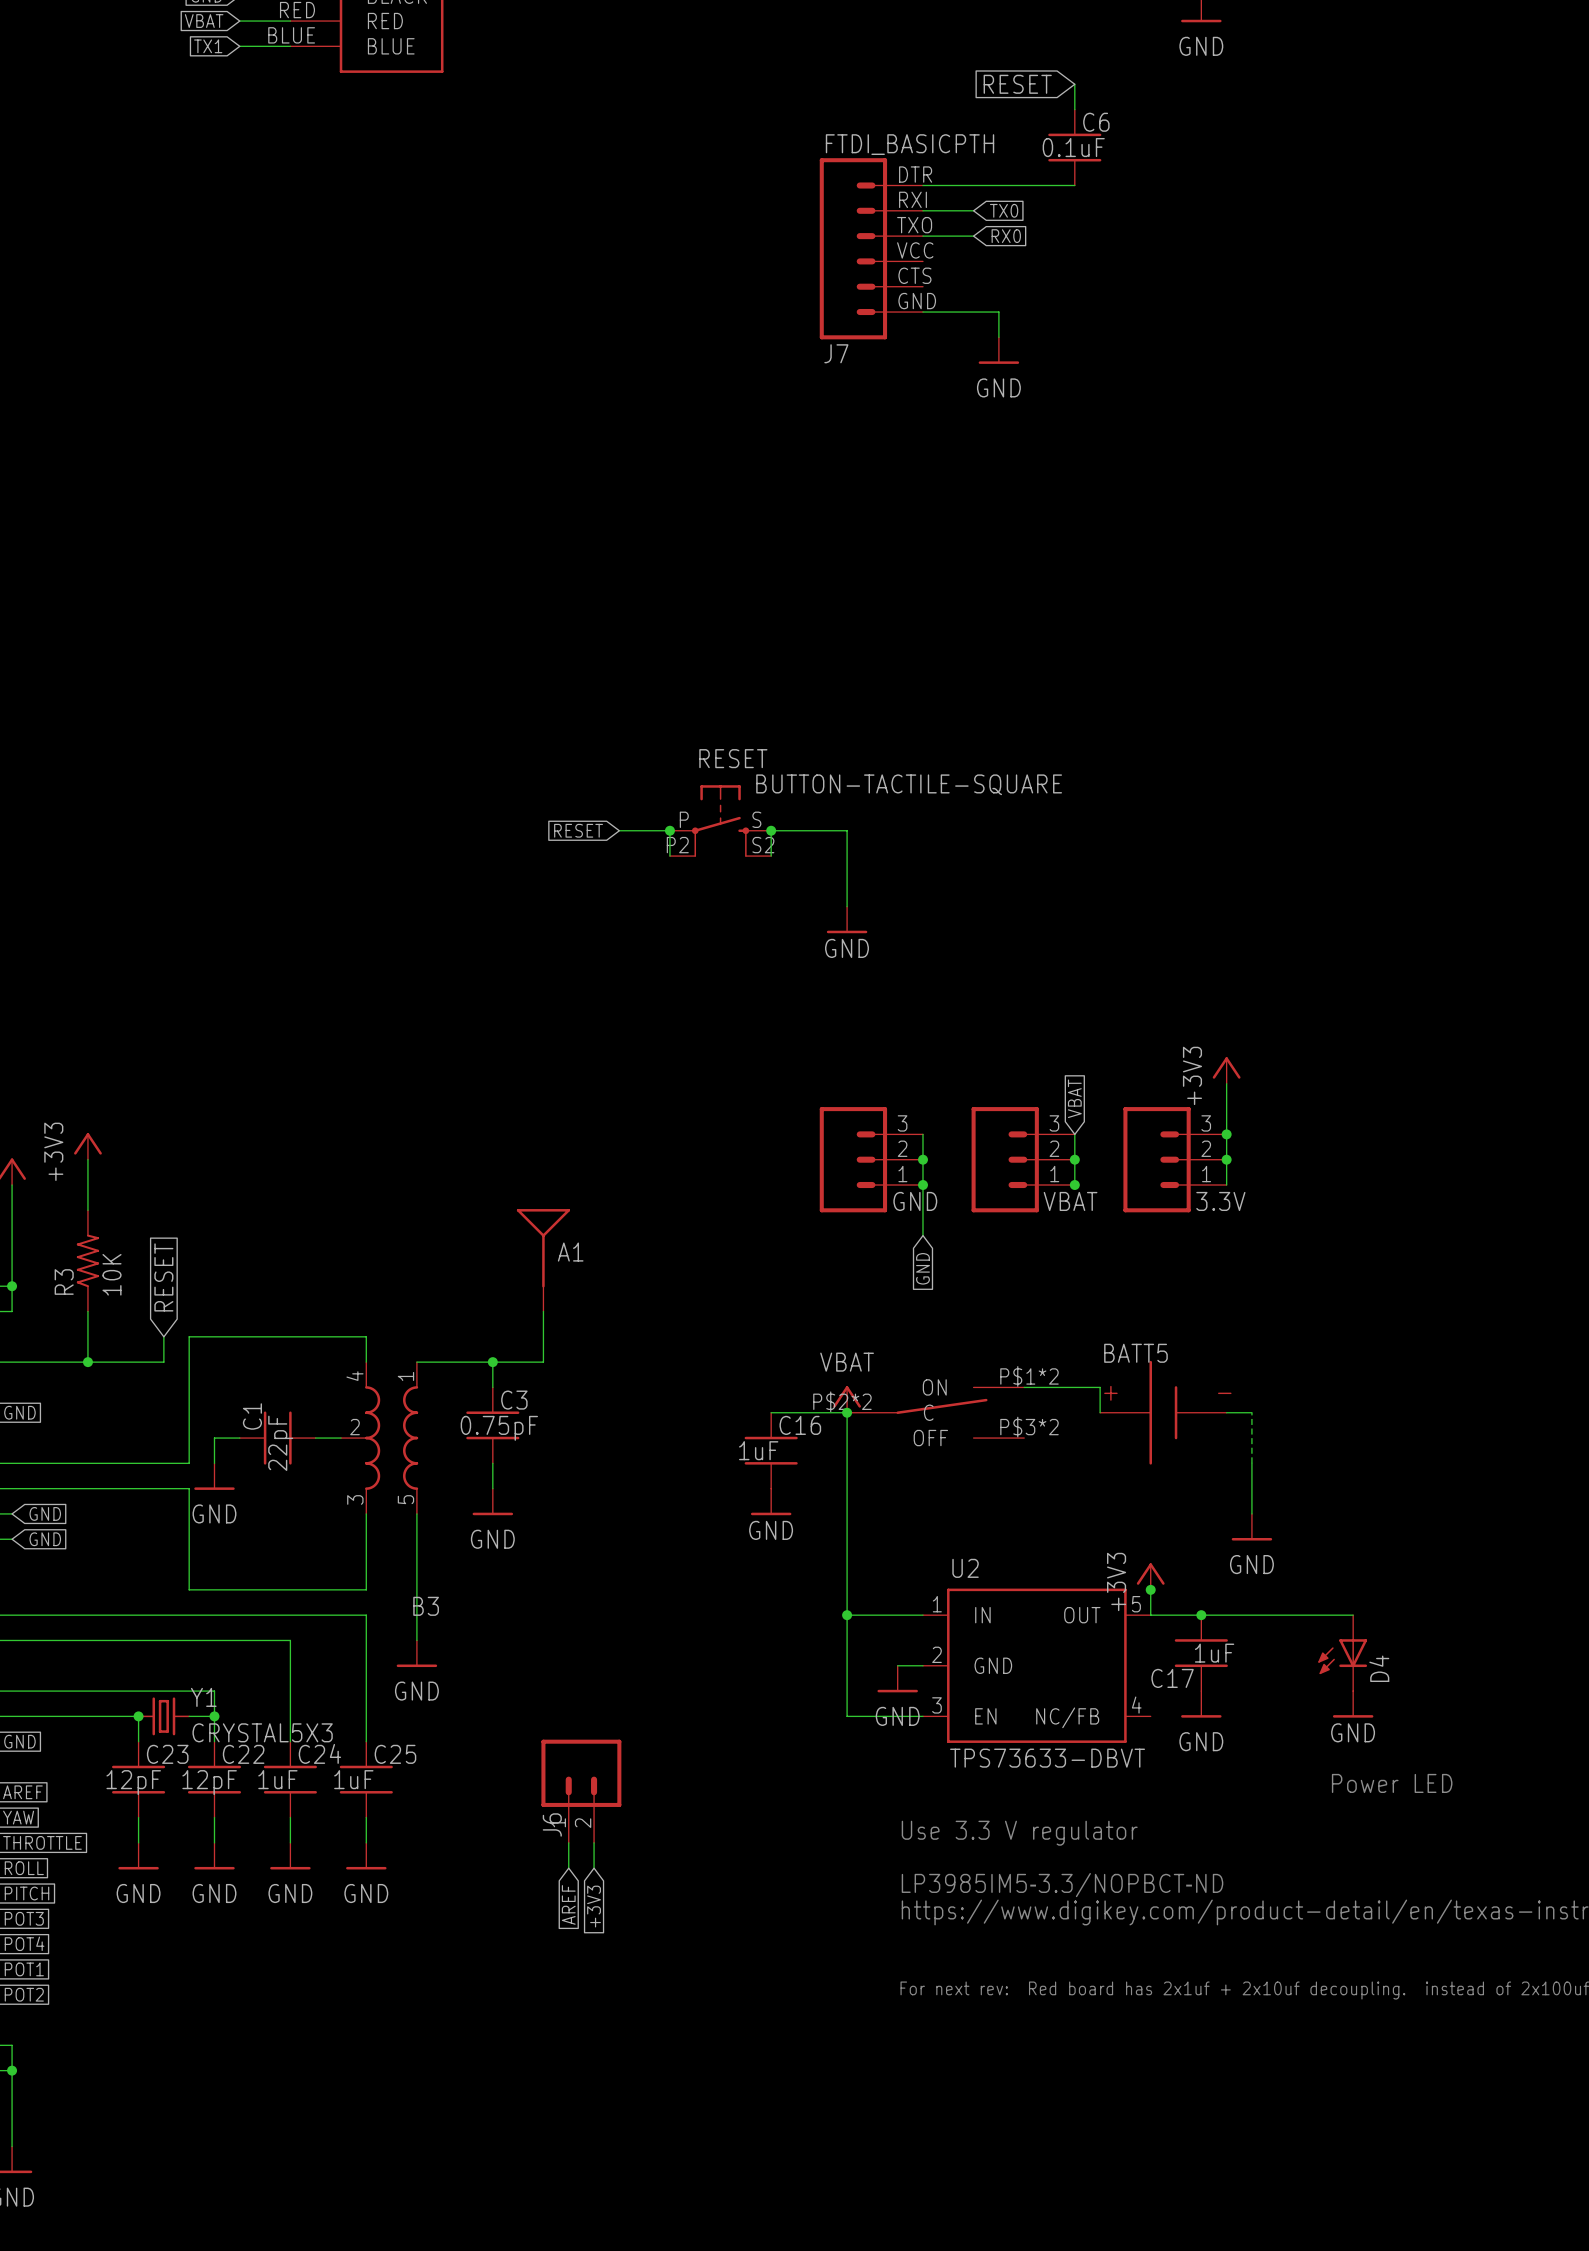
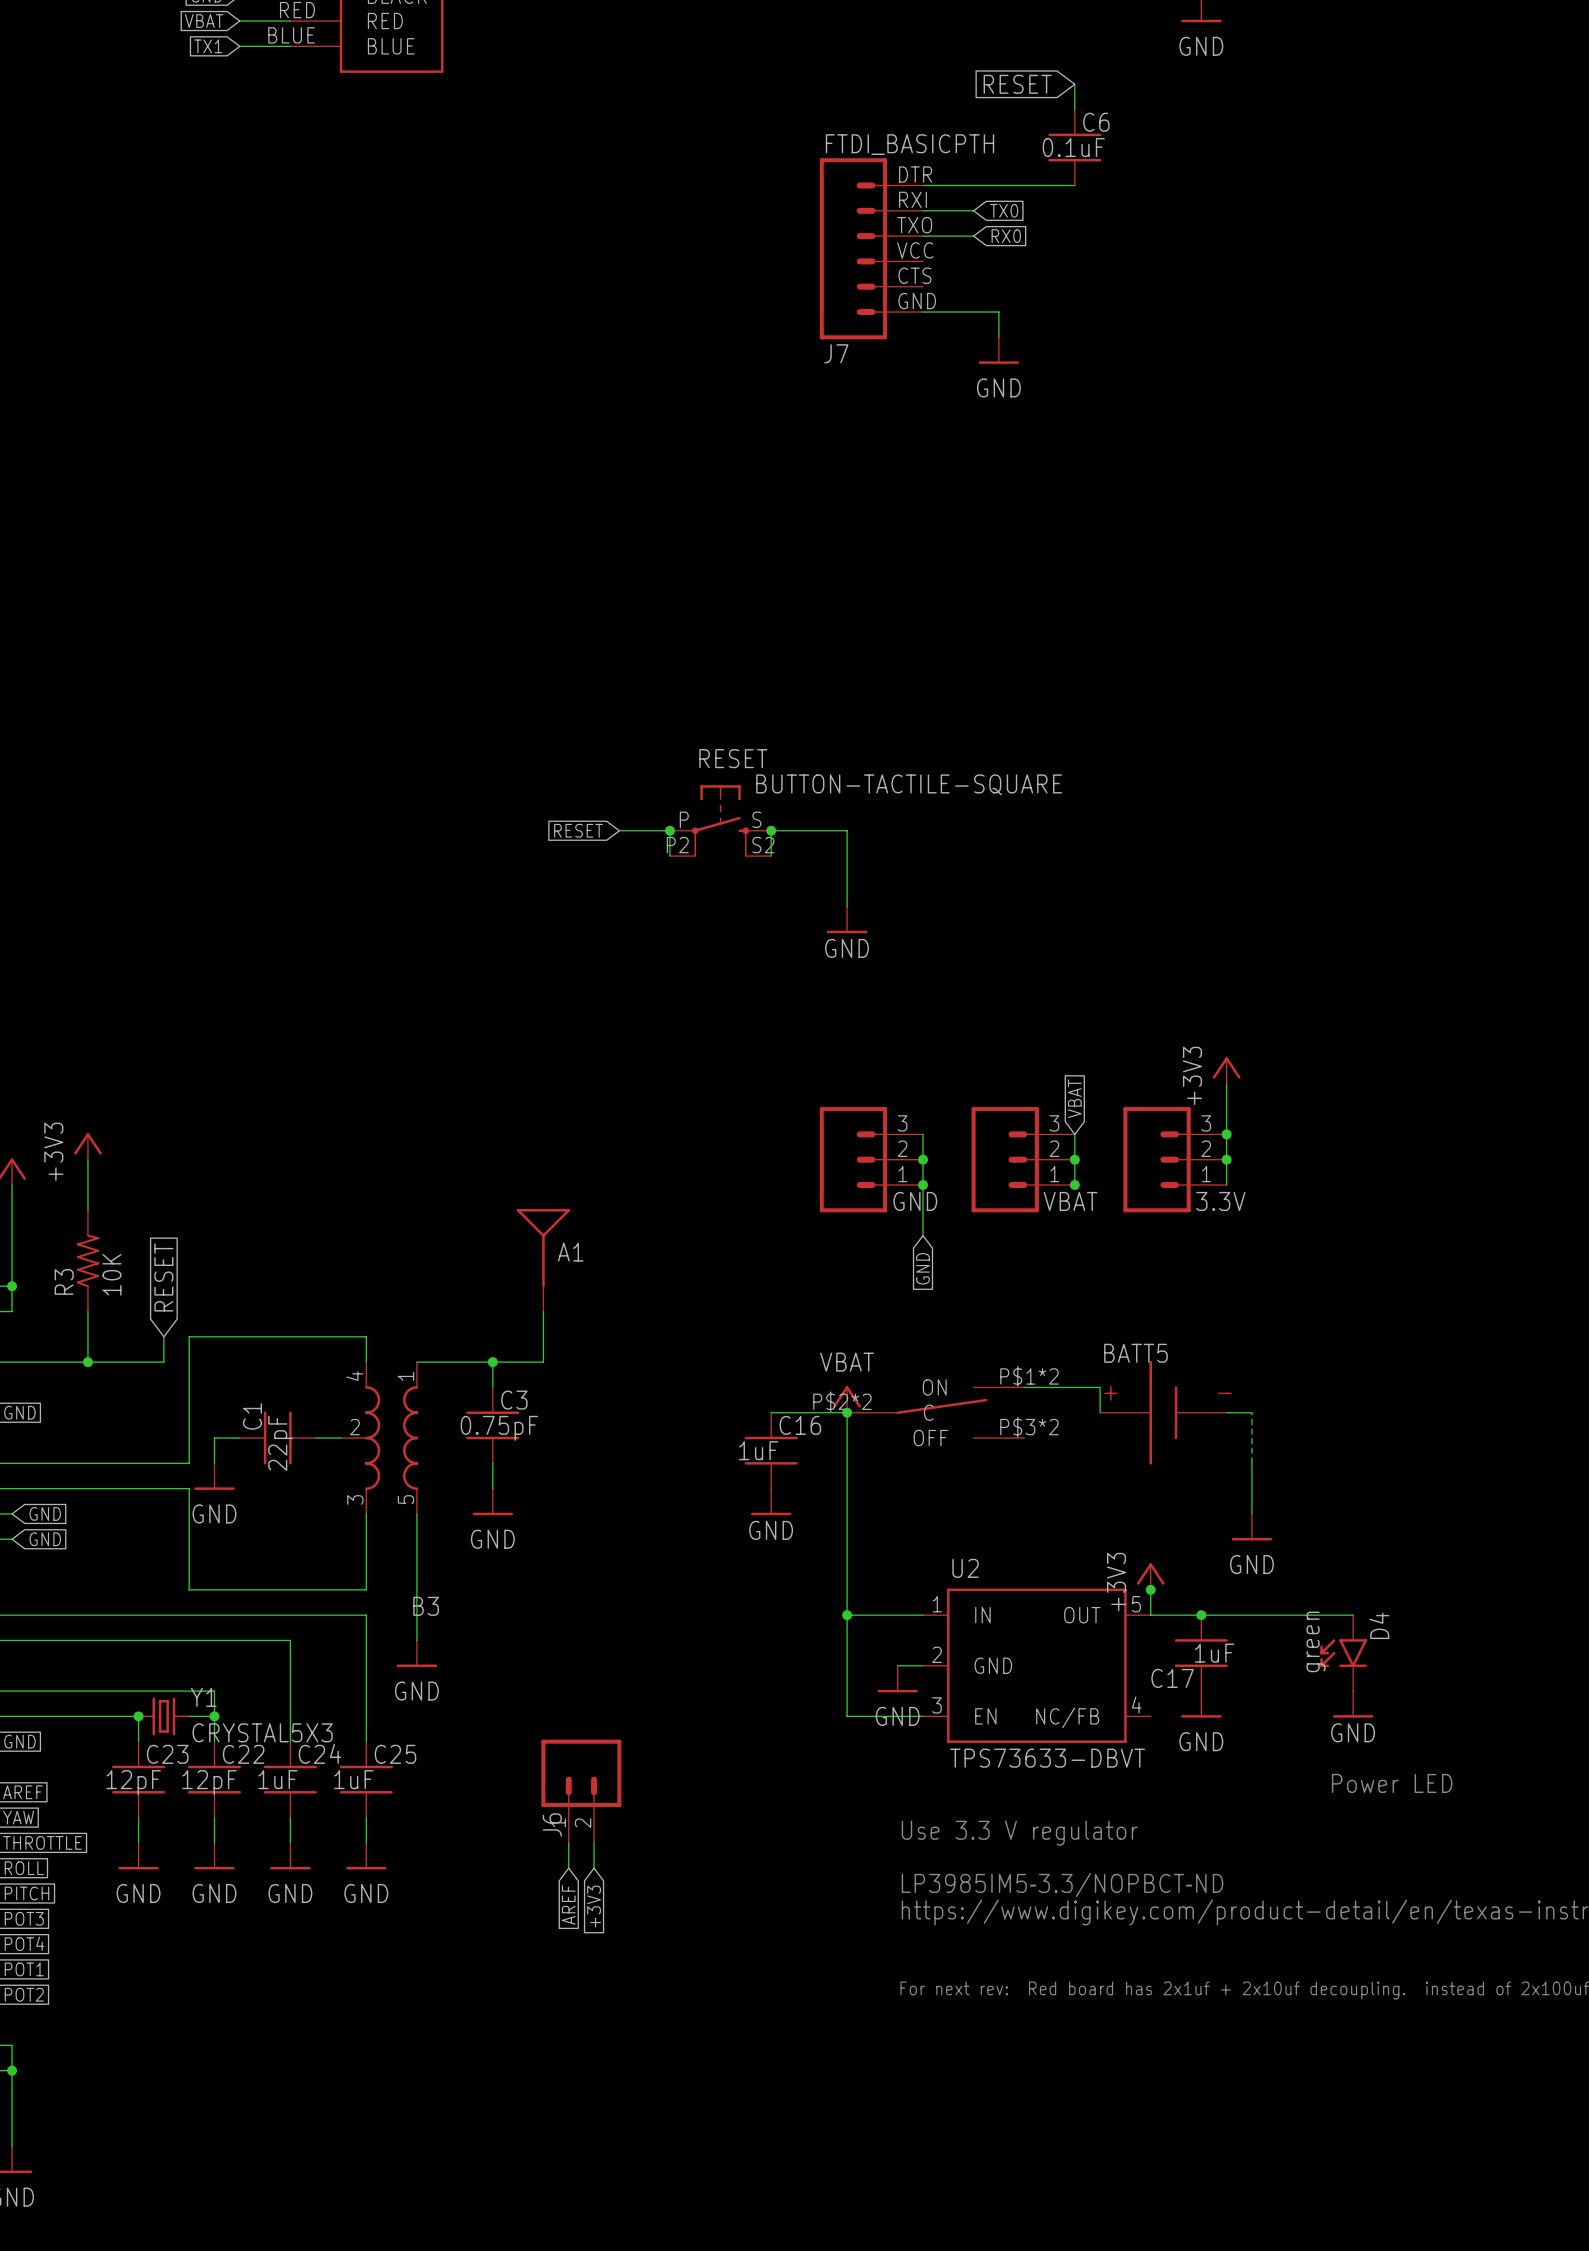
D4 symbol: [1318, 1615, 1368, 1692] -> [1320, 1615, 1368, 1692]
D4 value: none -> green (1316, 1641)
D4 name position: D4 (1379, 1668) -> D4 (1379, 1625)

